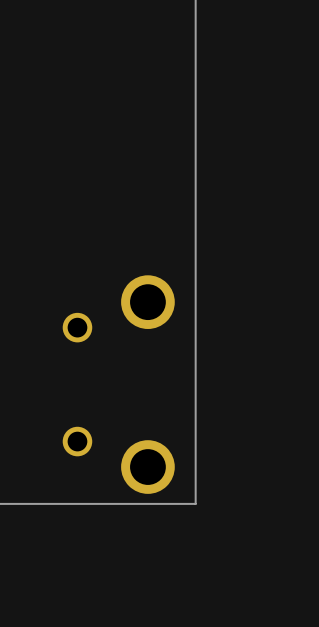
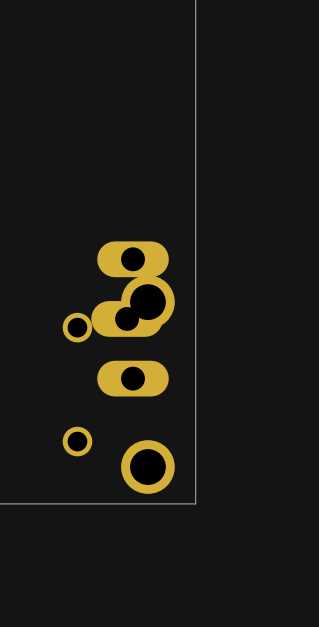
part: none -> (130, 318)

